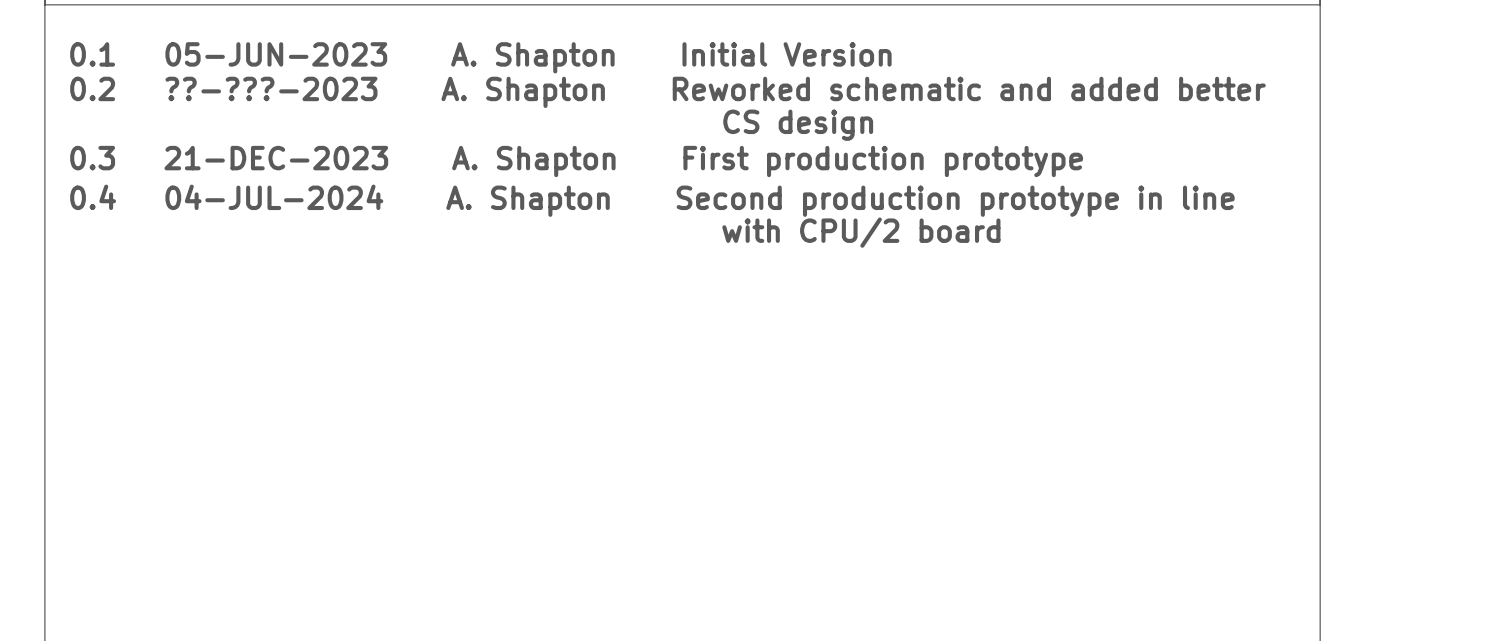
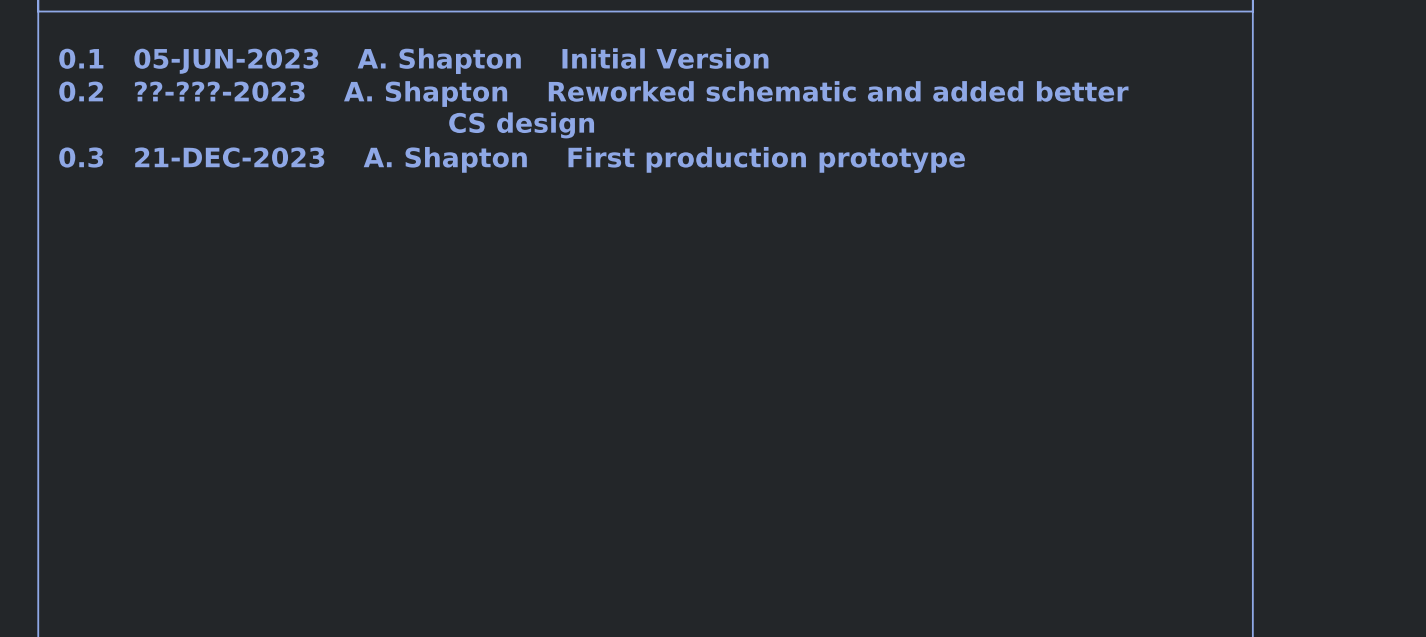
text: 0.4 04-JUL-2024 A. Shapton Second production prototype in line (652, 200) -> none
text: with CPU/2 board (861, 232) -> none

